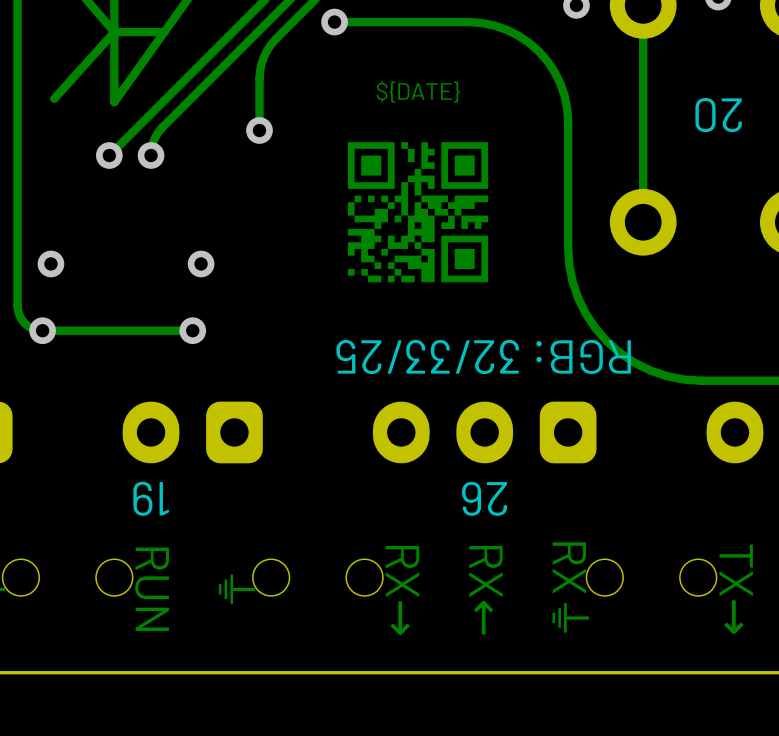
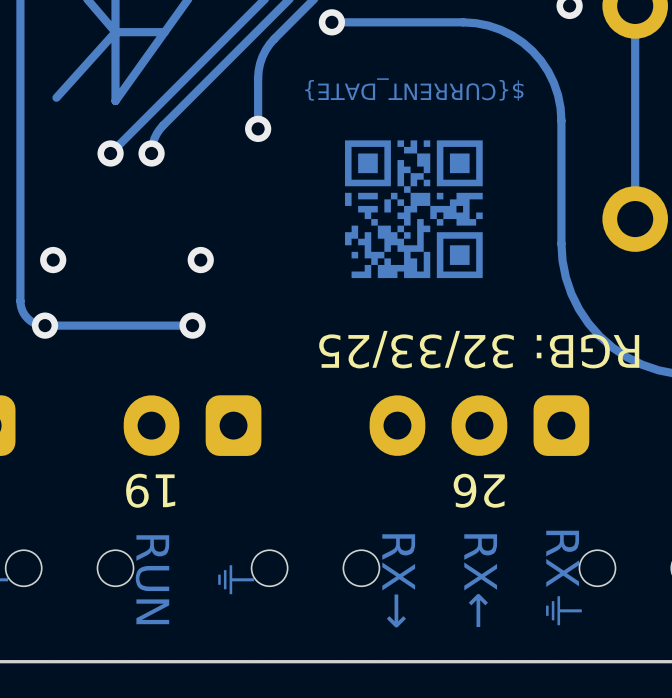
part footprint: [347, 142, 489, 283] -> [345, 140, 483, 279]

